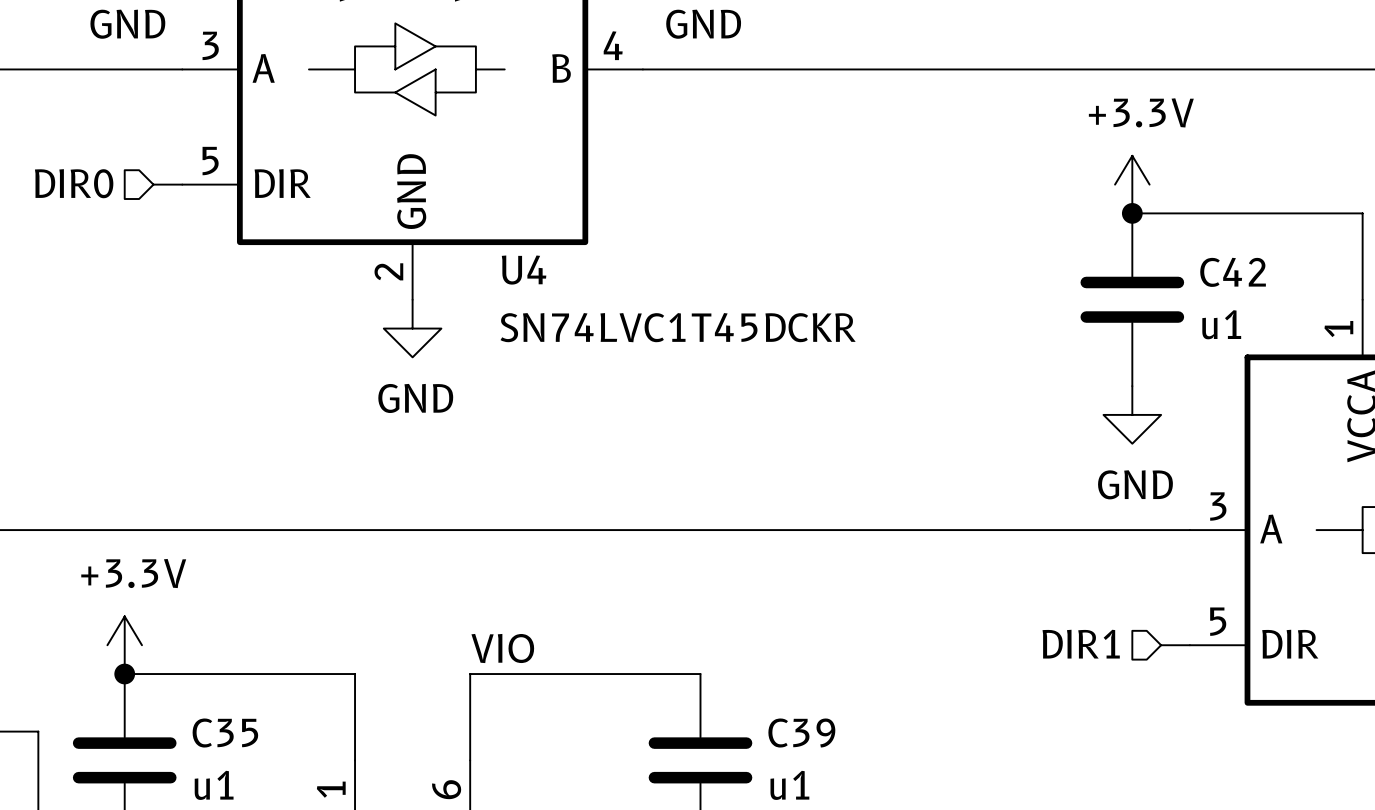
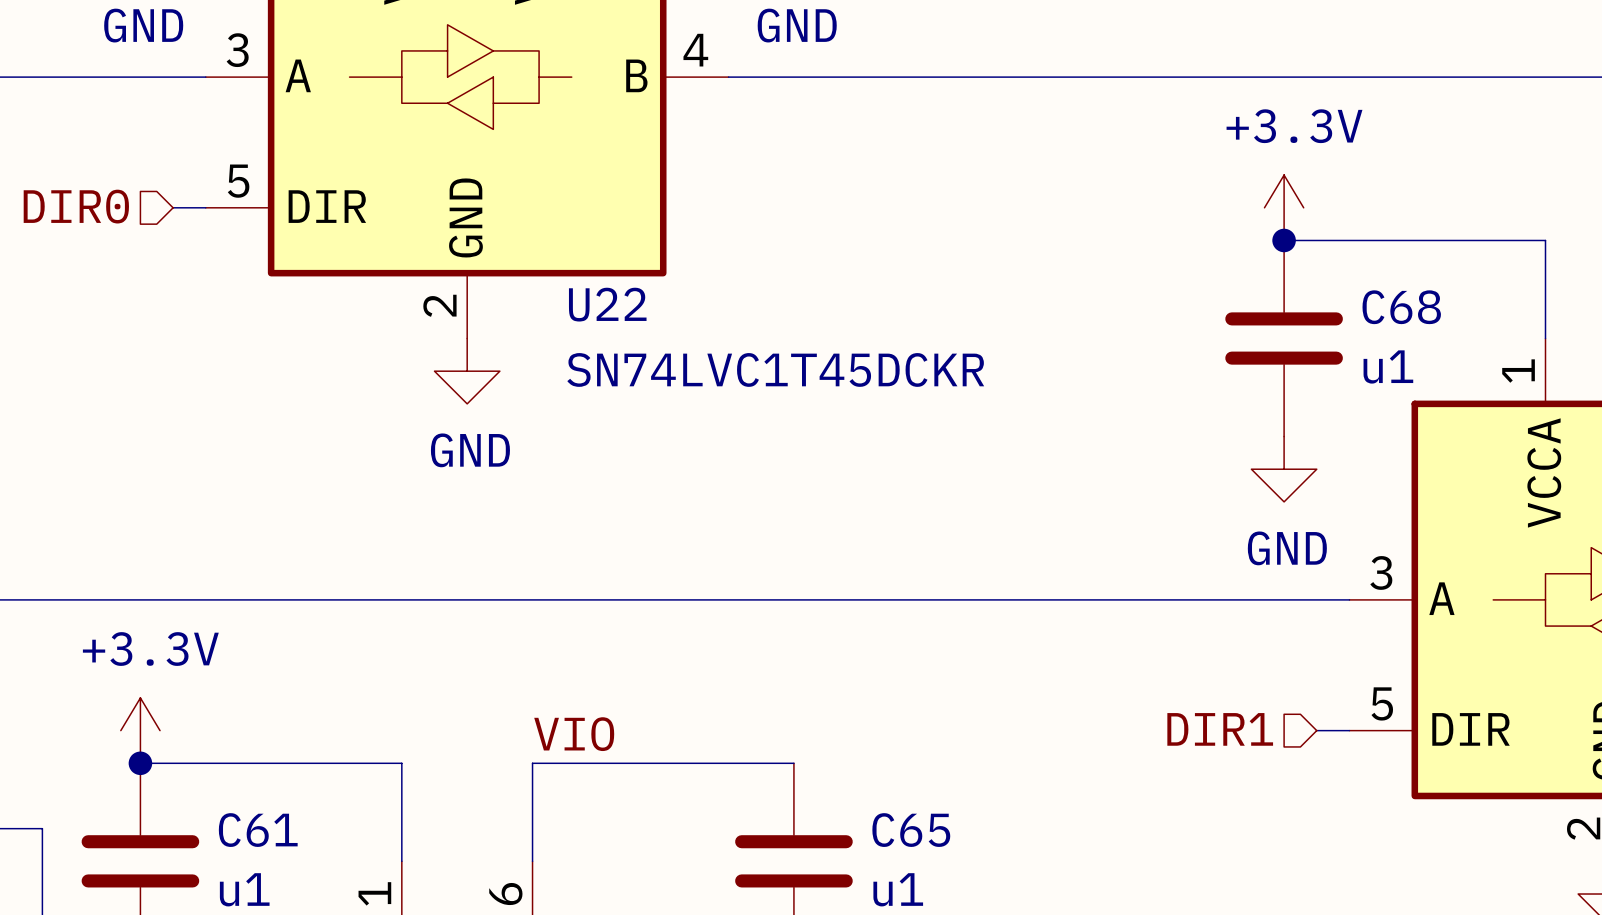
U4 name: U4 (524, 270) -> U22 (607, 304)
C42 name: C42 (1233, 272) -> C68 (1401, 307)
C35 name: C35 (225, 733) -> C61 (258, 830)
C39 name: C39 (801, 733) -> C65 (911, 830)

